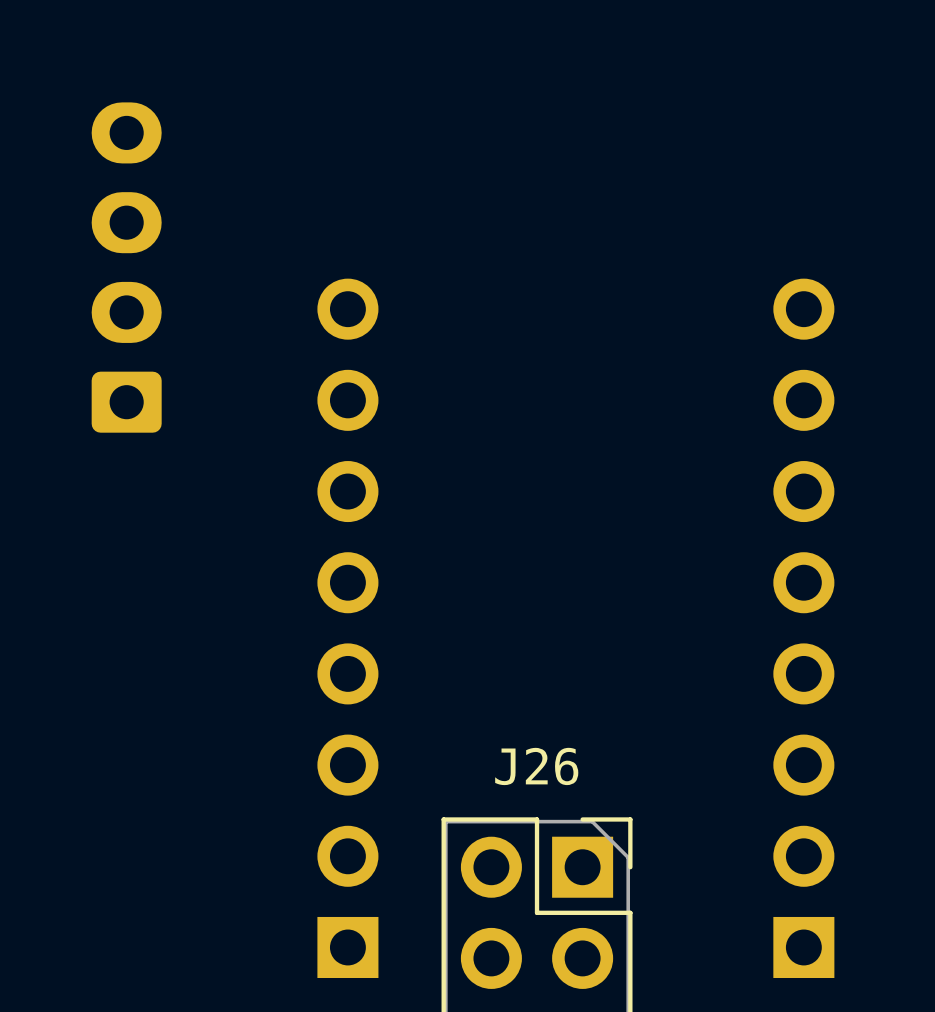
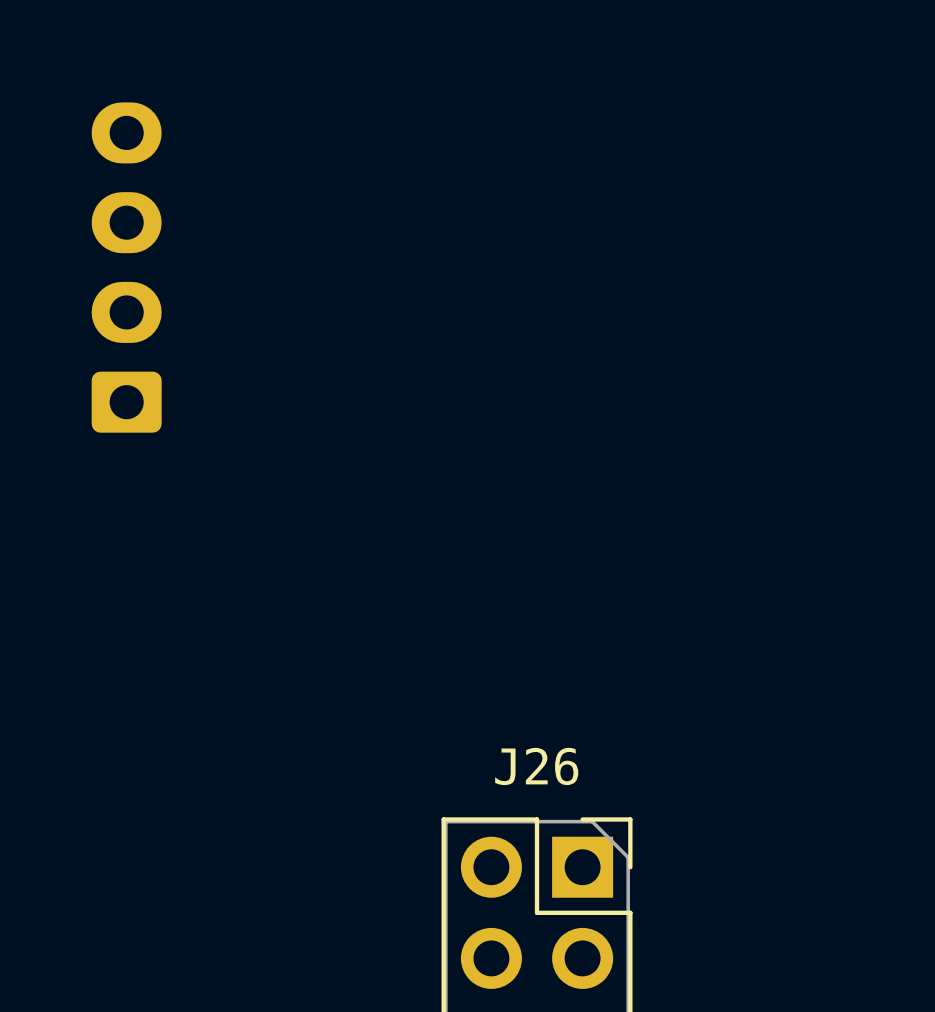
part: (347, 628) -> none
part: (803, 628) -> none

